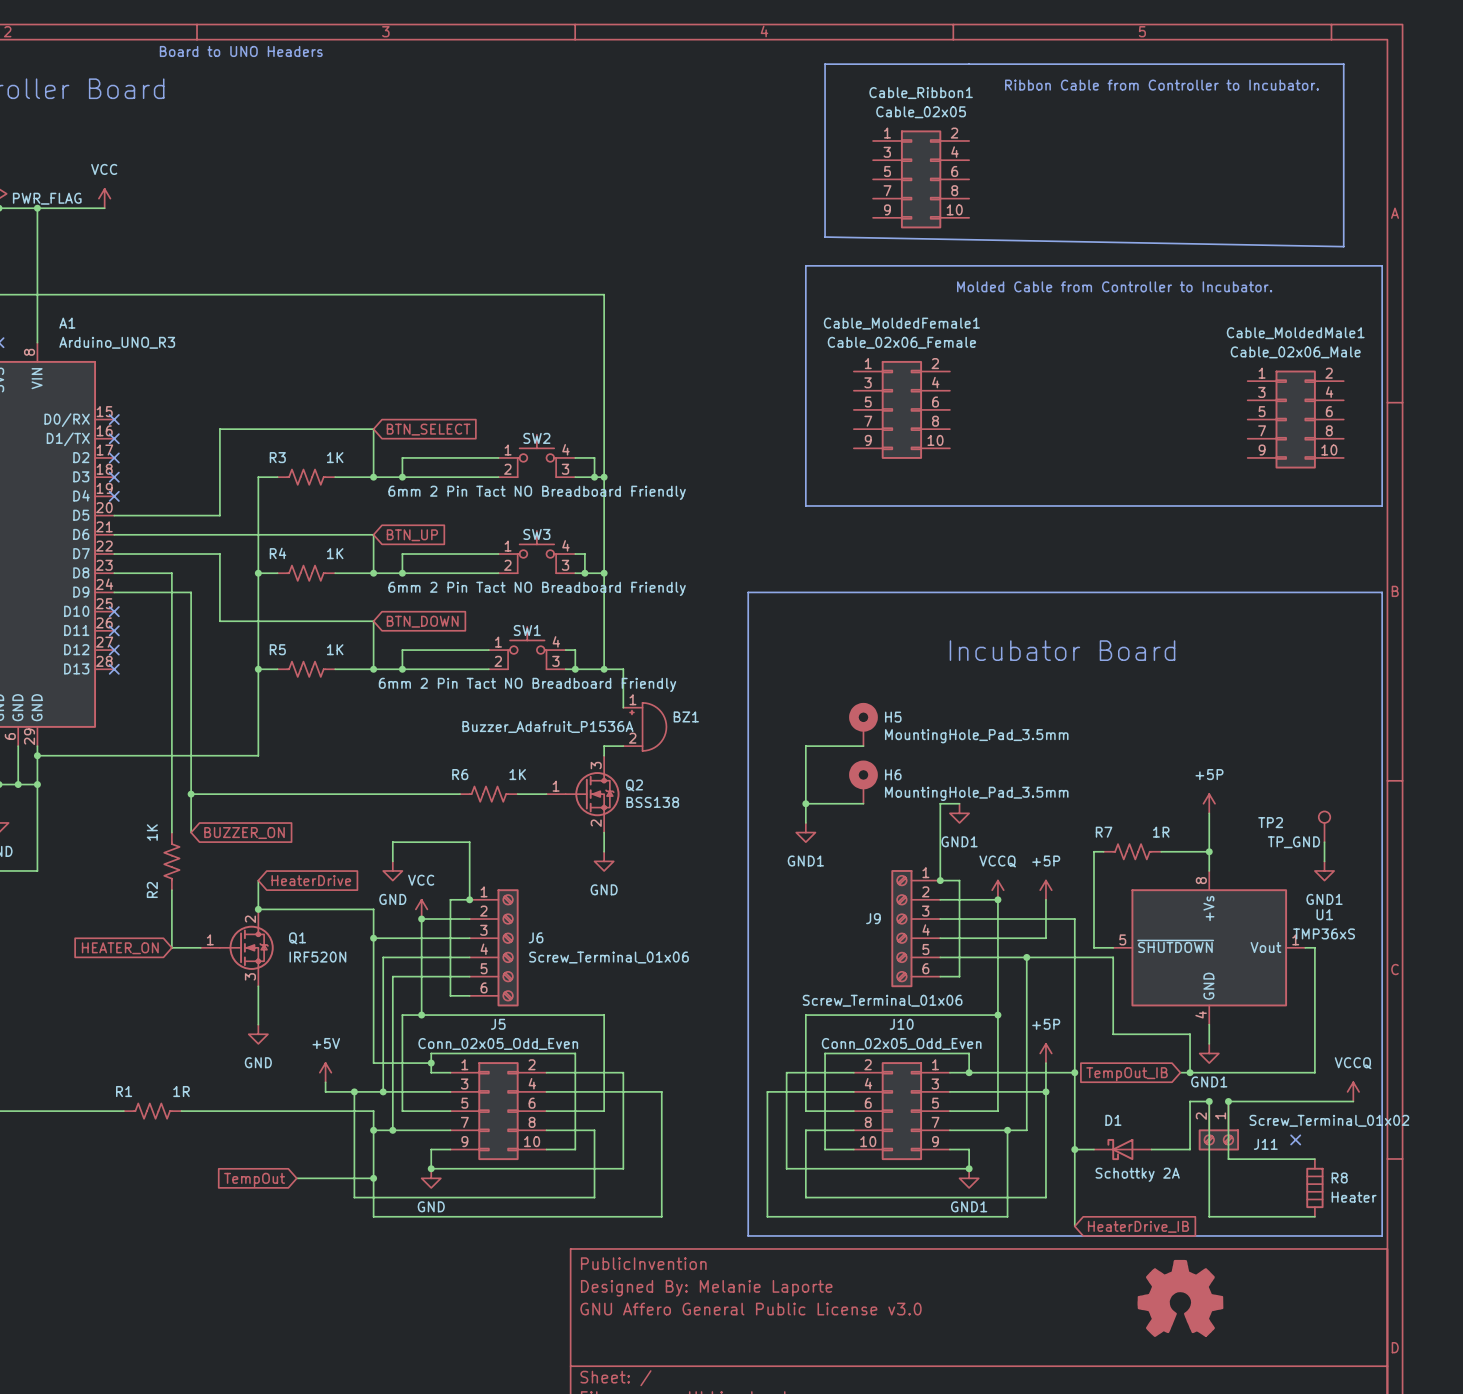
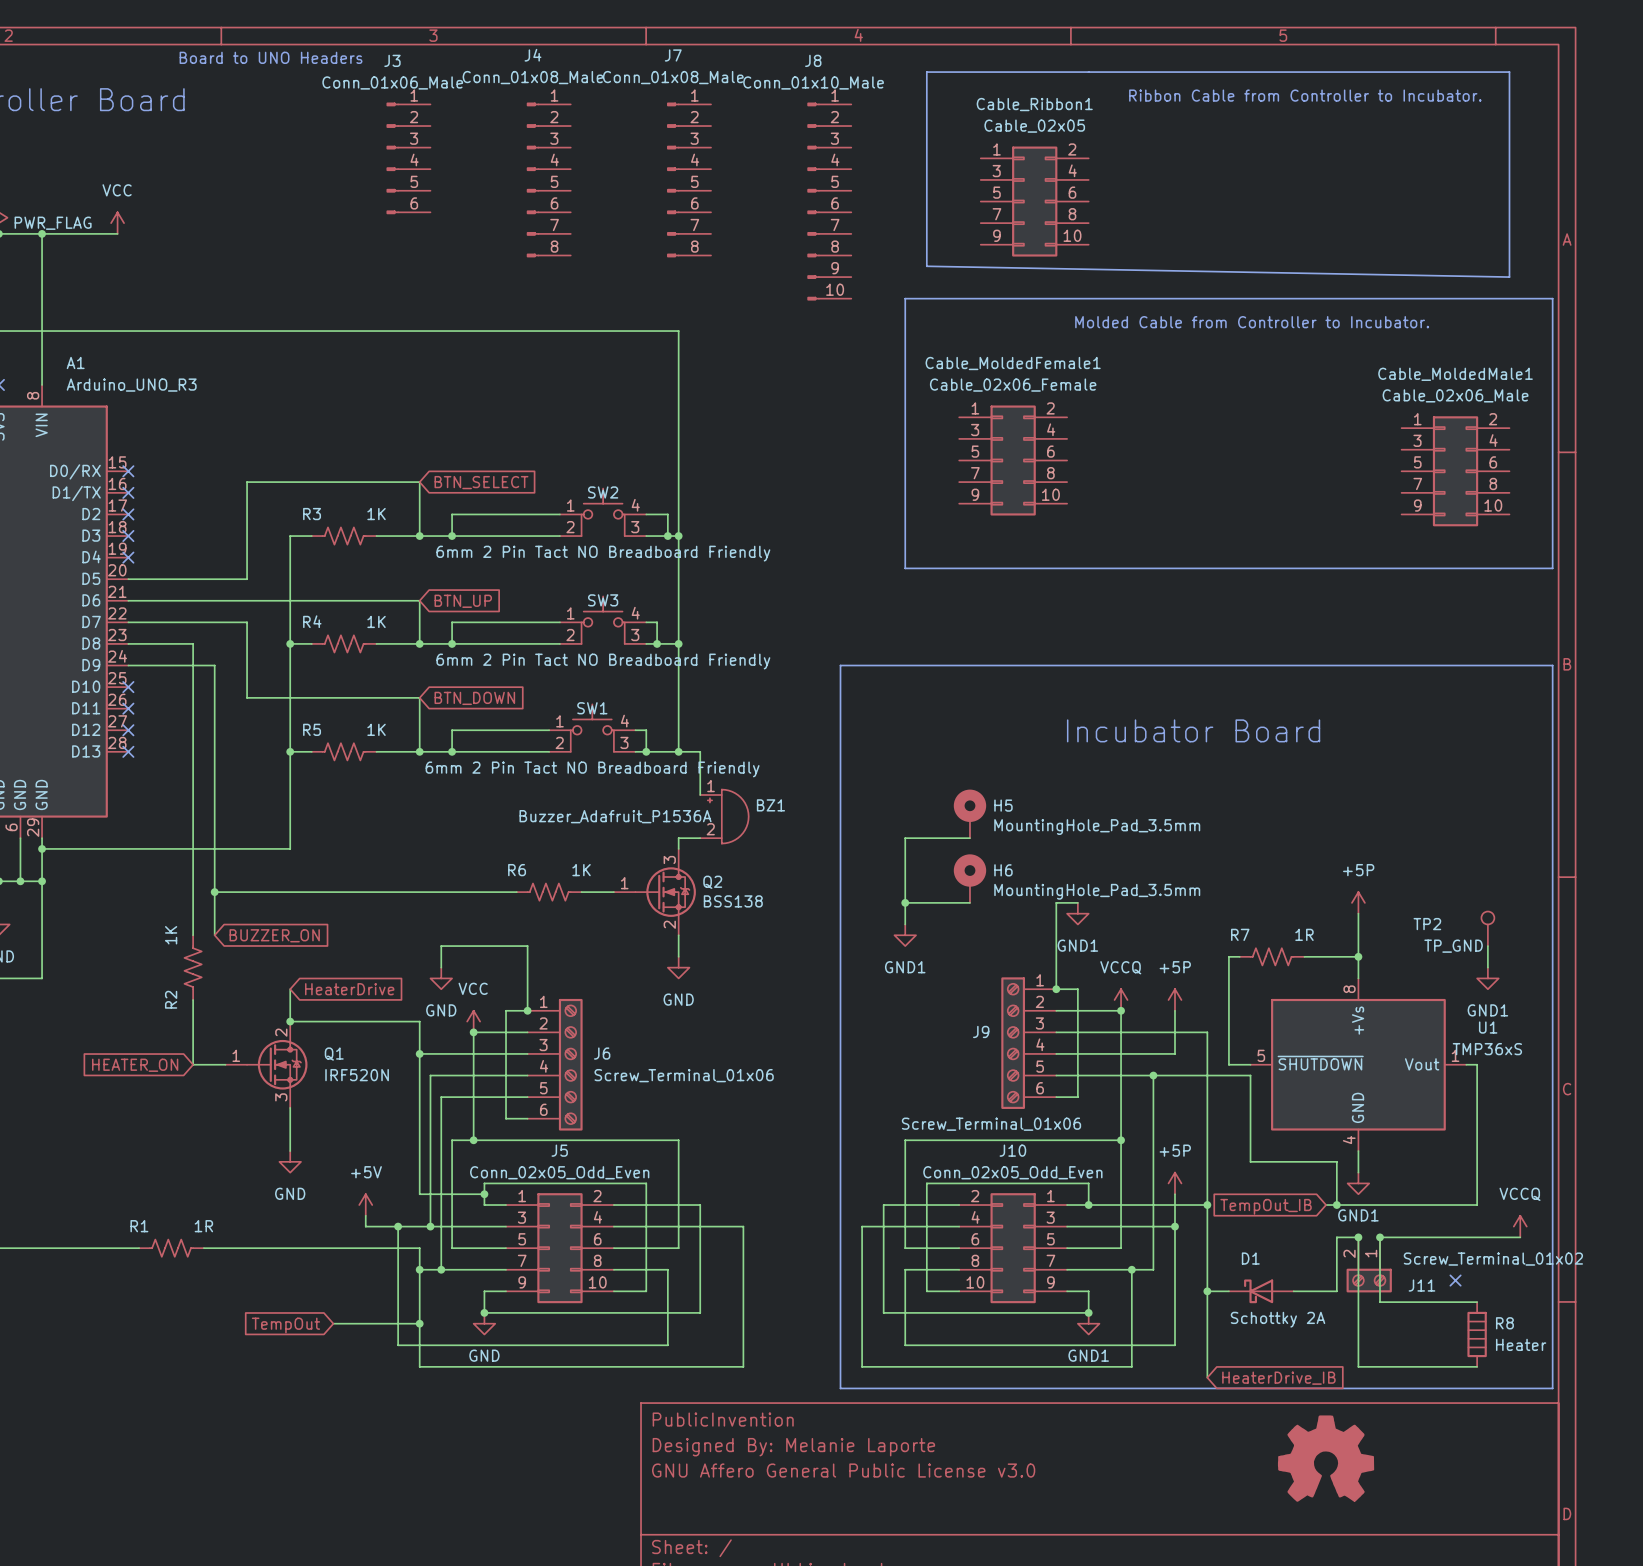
J3: none -> Conn_01x06_Male (408, 158)
J4: none -> Conn_01x08_Male (548, 179)
J7: none -> Conn_01x08_Male (689, 179)
J8: none -> Conn_01x10_Male (829, 201)

